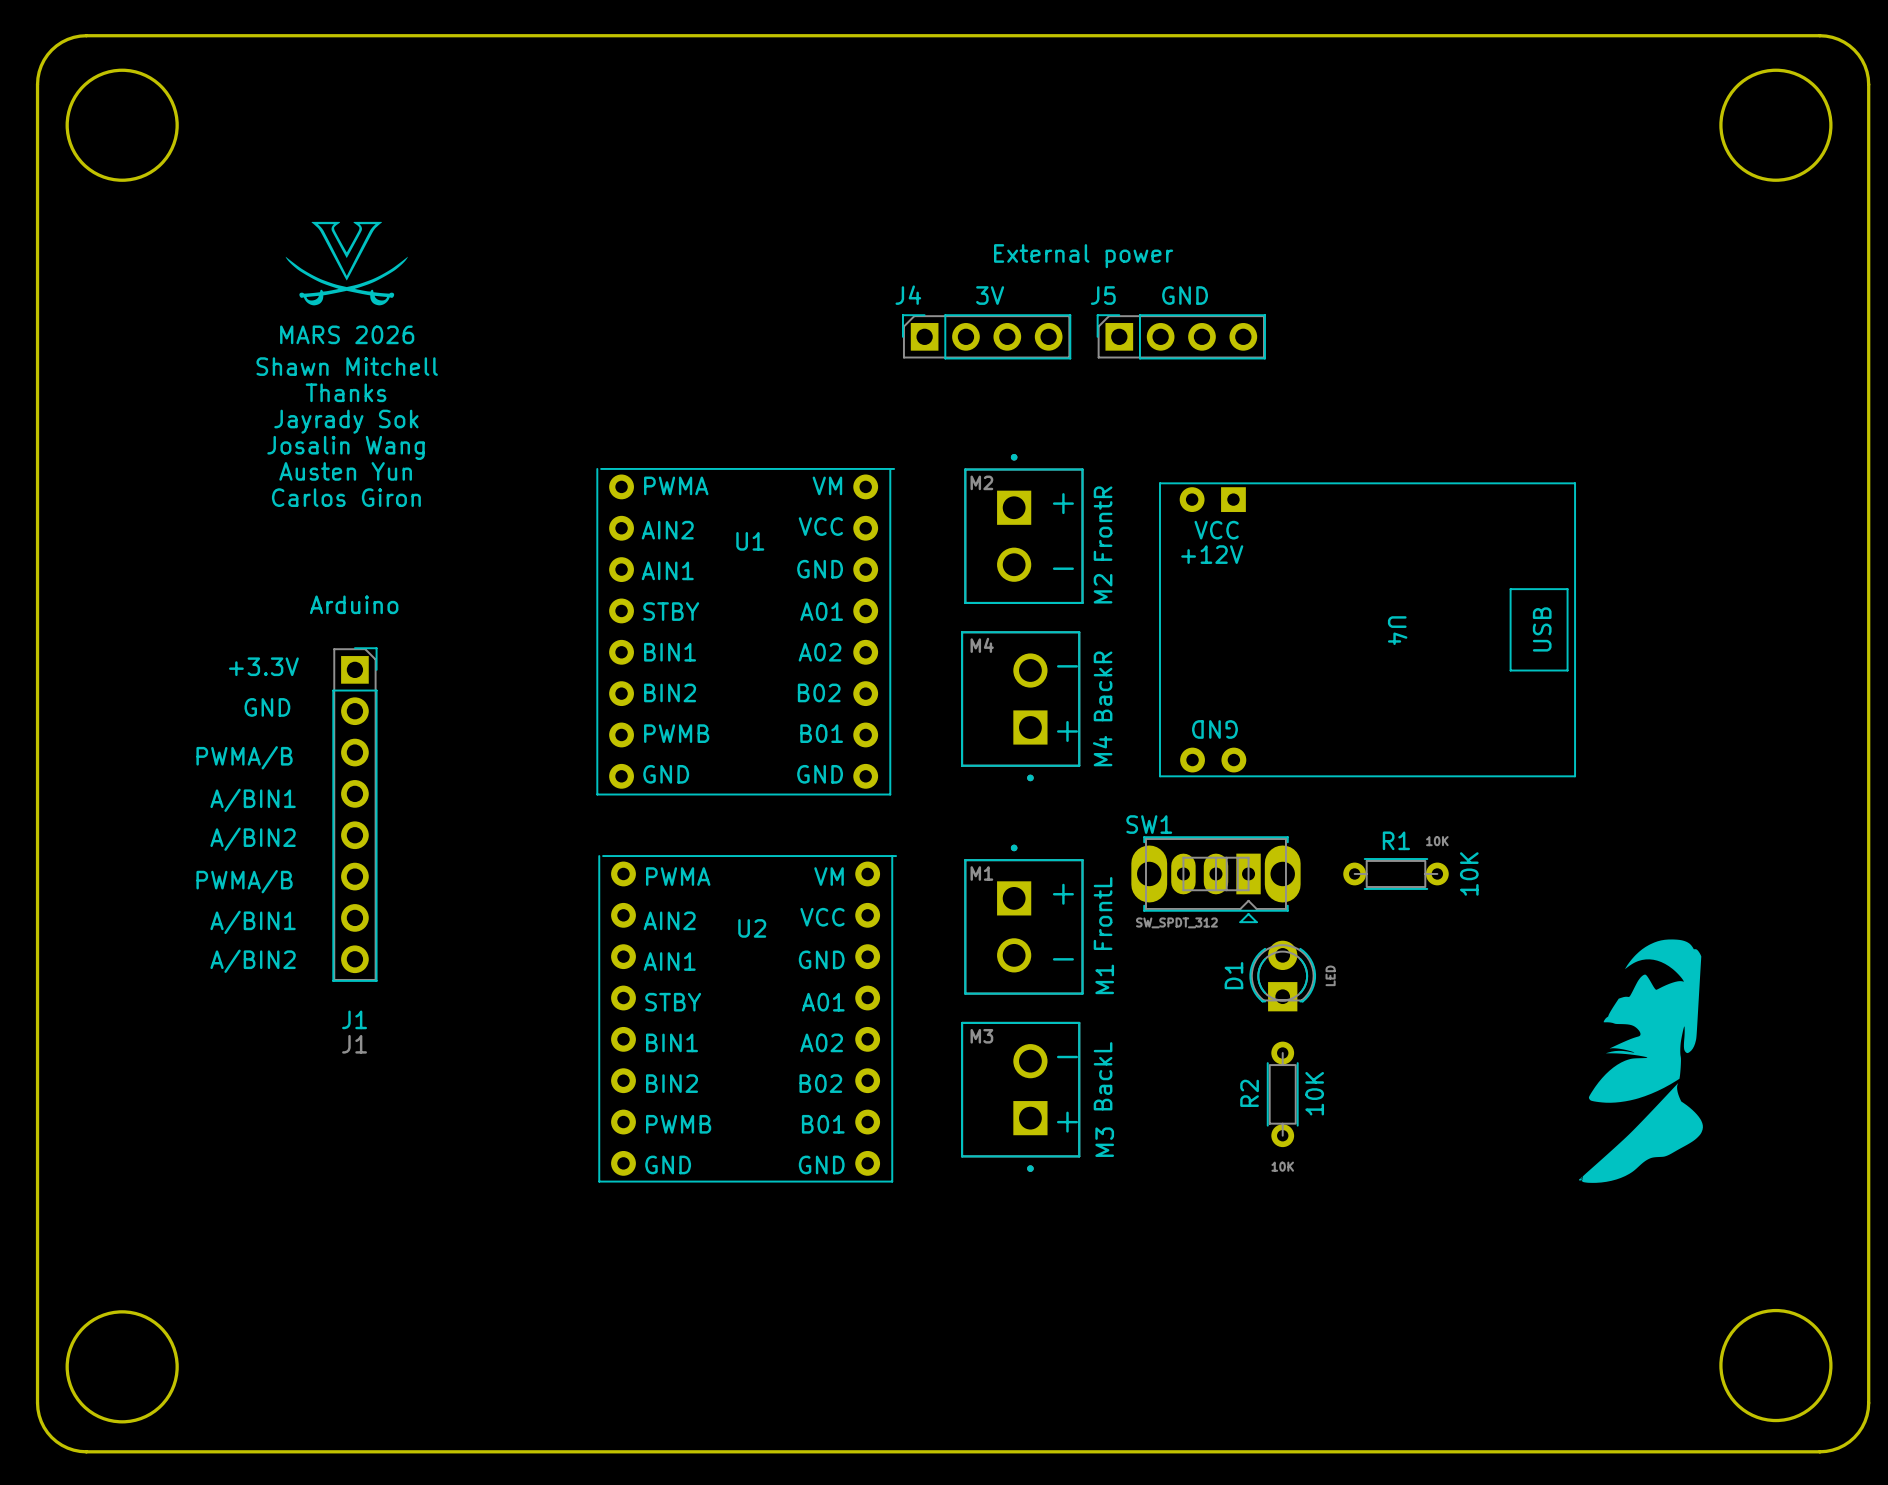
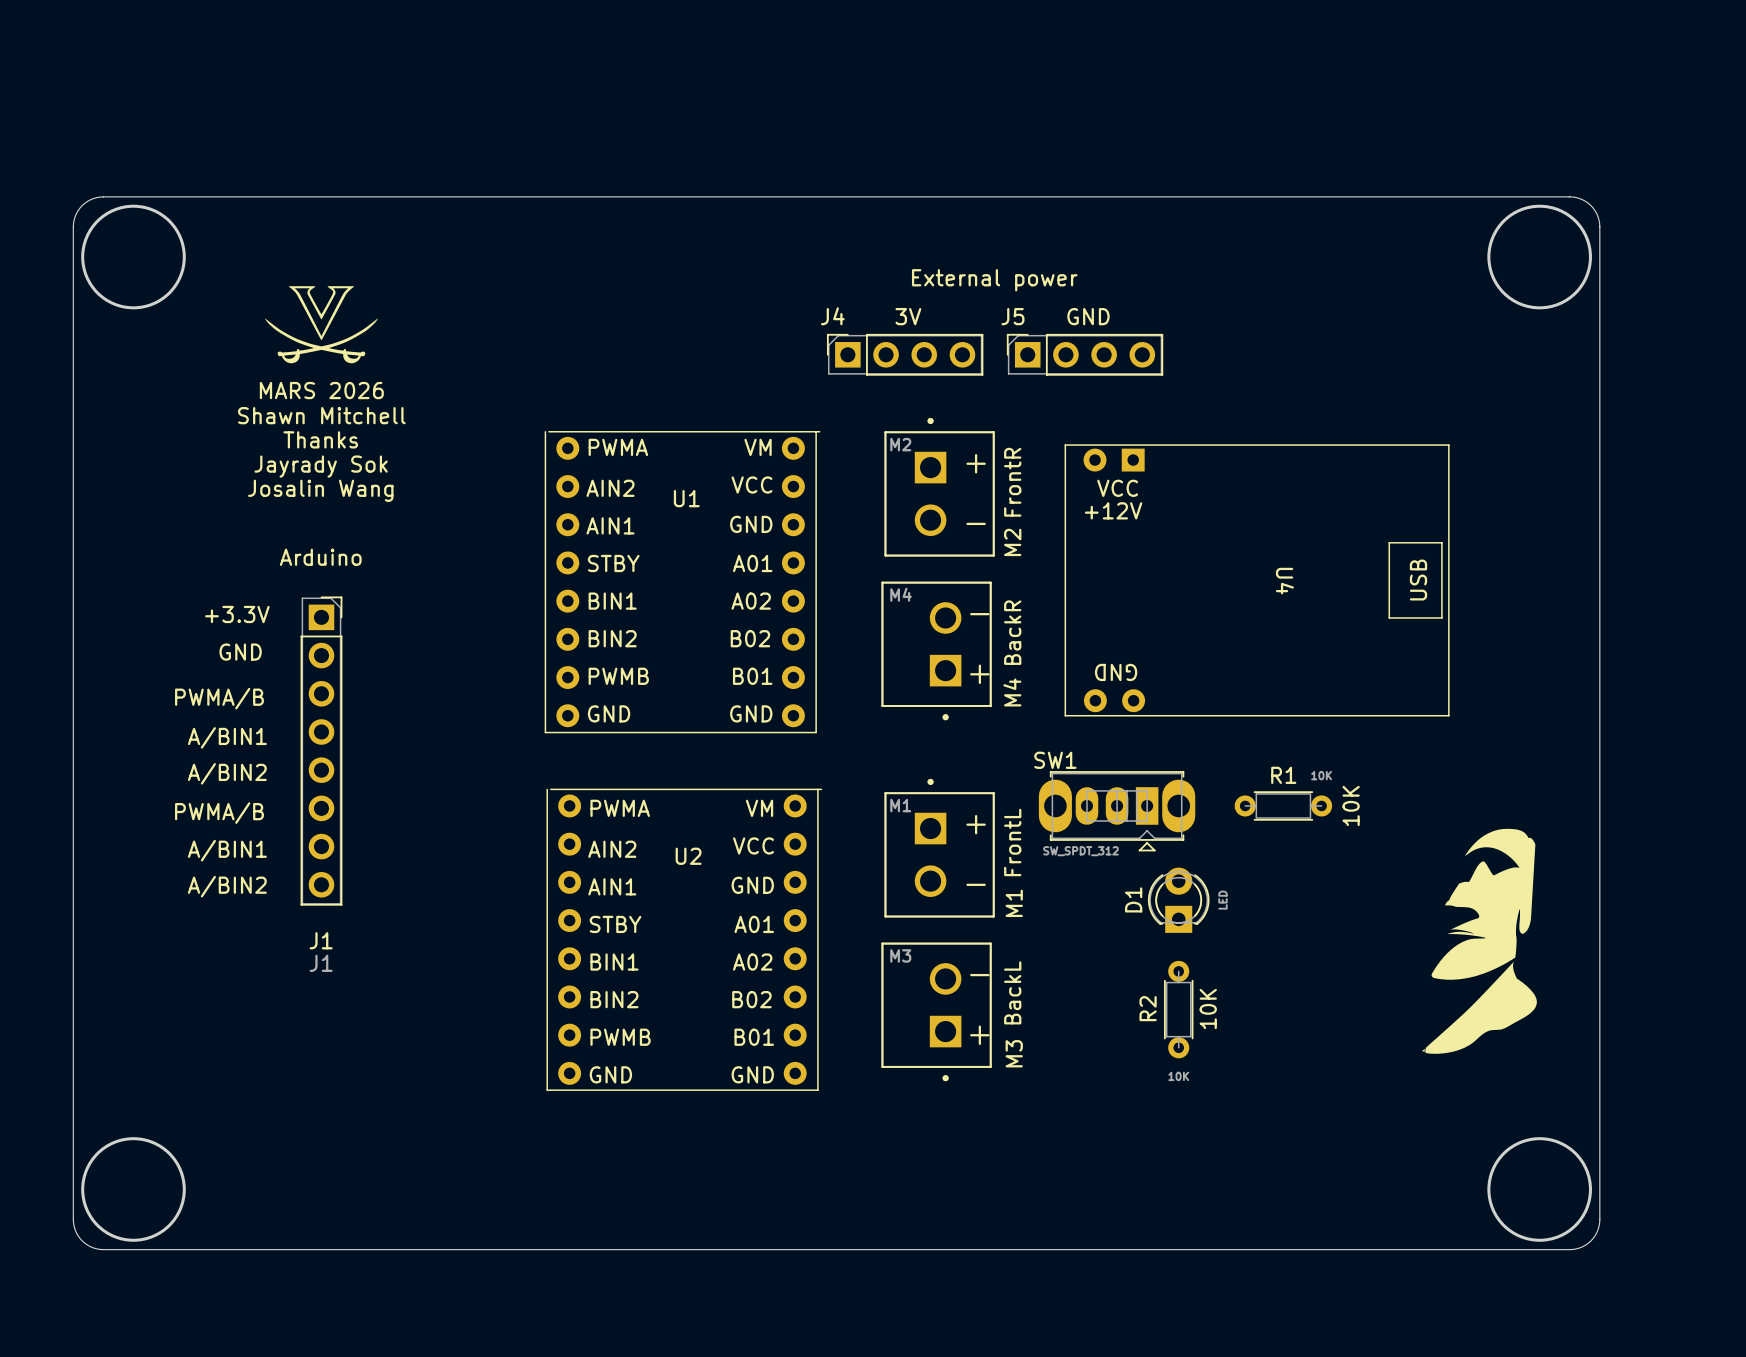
board edge: (86, 35) (1819, 35) (1832, 37) (1849, 45) (1862, 60) (1867, 71) (1868, 84) (1868, 1402) (1867, 1415) (1858, 1432) (1844, 1445) (1832, 1450) (1819, 1451) (86, 1451) (73, 1450) (56, 1441) (44, 1427) (39, 1415) (37, 1402) (37, 84) (41, 65) (51, 50) (67, 39) (86, 35) -> (103, 196) (93, 198) (82, 205) (76, 213) (73, 226) (73, 1219) (76, 1232) (87, 1245) (103, 1249) (1569, 1249) (1582, 1246) (1595, 1235) (1599, 1219) (1599, 226) (1595, 210) (1585, 201) (1569, 196) (103, 196)
round board edge position: (122, 125) -> (133, 257)
round board edge position: (1775, 125) -> (1539, 257)
text position: External power (1083, 256) -> External power (994, 280)
drawing position: (346, 263) -> (321, 324)
text position: MARS 2026 (347, 334) -> MARS 2026 (321, 390)
J4 position: (986, 336) -> (905, 354)
J5 position: (1181, 336) -> (1085, 354)
text position: Shawn Mitchell (347, 366) -> Shawn Mitchell (321, 415)
text position: Thanks (346, 392) -> Thanks (320, 439)
text position: Jayrady Sok (346, 421) -> Jayrady Sok (321, 466)
text position: Josalin Wang (346, 447) -> Josalin Wang (320, 490)
text: Austen Yun (345, 471) -> none
text: Carlos Giron (346, 497) -> none
drawing position: (1640, 1061) -> (1479, 941)
round board edge position: (1775, 1365) -> (1539, 1189)
round board edge position: (122, 1366) -> (133, 1189)

